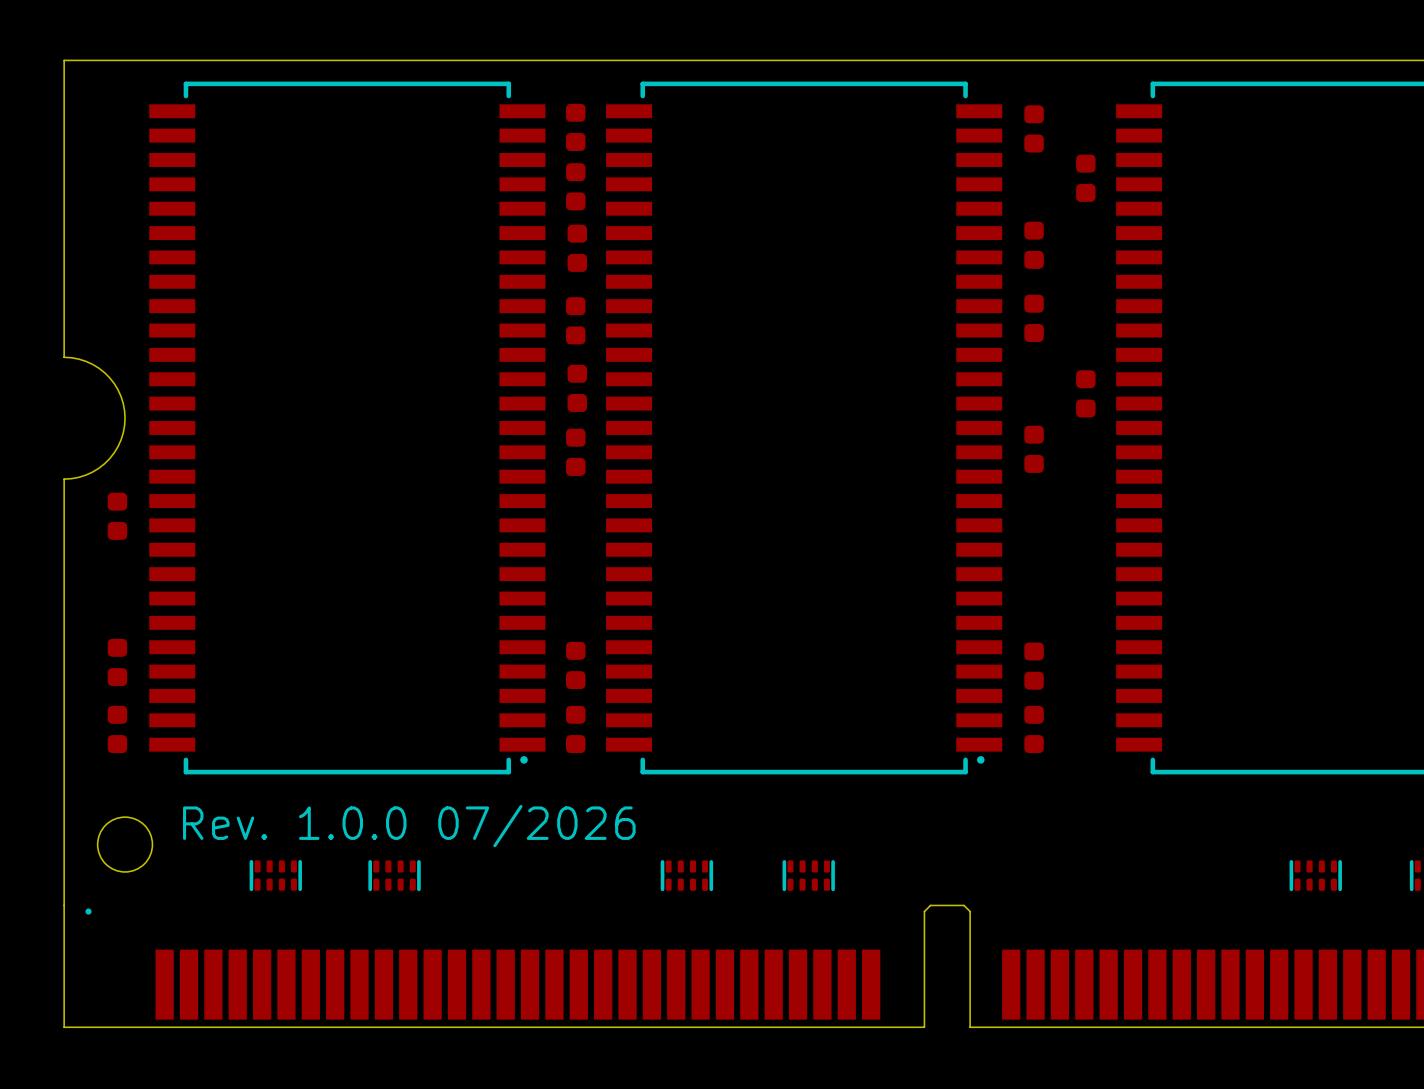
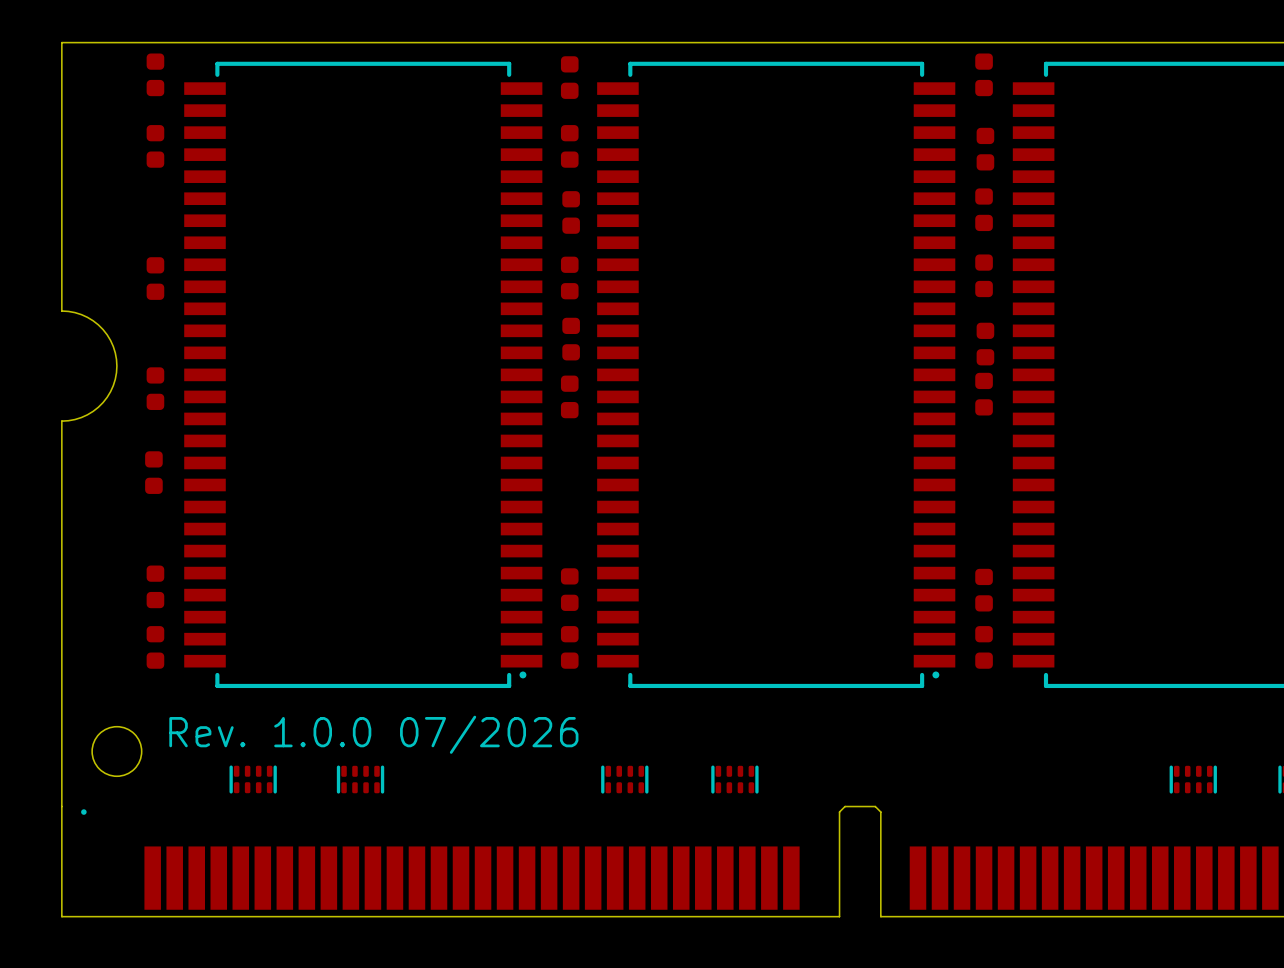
part: none -> (155, 74)
part: none -> (569, 77)
part: (575, 127) -> none
part position: (1034, 128) -> (984, 74)
part: none -> (155, 146)
part: none -> (569, 146)
part: (575, 186) -> none
part: (1034, 245) -> none
part: none -> (984, 209)
part: (577, 248) -> none
part: none -> (571, 212)
part: (1034, 318) -> none
part: none -> (984, 275)
part: (575, 320) -> none
part: none -> (569, 277)
part: none -> (155, 278)
part: (577, 388) -> none
part: none -> (571, 339)
part position: (347, 427) -> (363, 374)
part position: (804, 427) -> (776, 374)
part: none -> (155, 388)
part position: (1034, 449) -> (984, 394)
part: (575, 452) -> none
part: none -> (569, 396)
part: (117, 516) -> none
part: none -> (153, 472)
part: (117, 662) -> none
part: none -> (155, 586)
part: (575, 665) -> none
part: none -> (569, 589)
part: (1034, 666) -> none
part: none -> (984, 590)
part: (117, 729) -> none
part: none -> (155, 647)
part: (575, 729) -> none
part: none -> (569, 647)
part: (1034, 729) -> none
part: none -> (984, 647)

